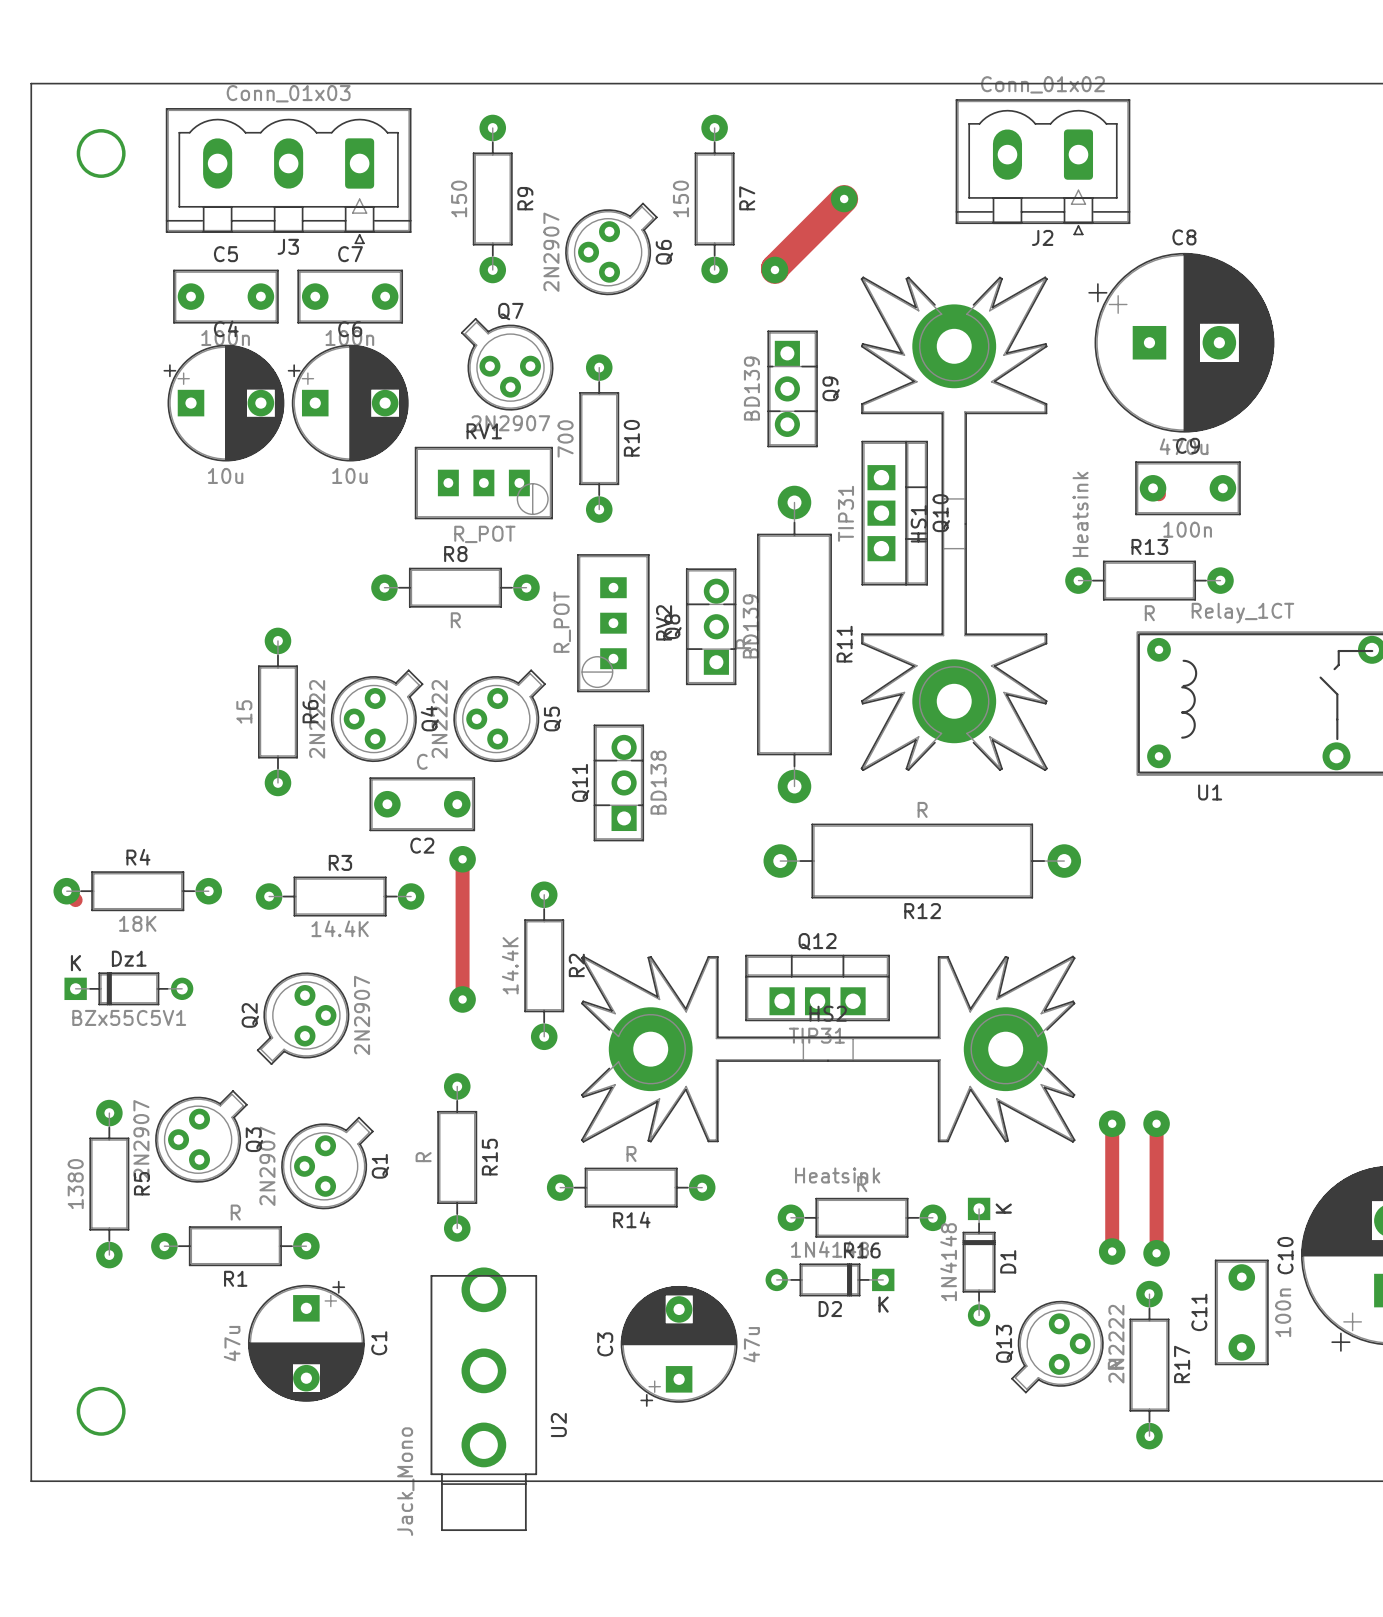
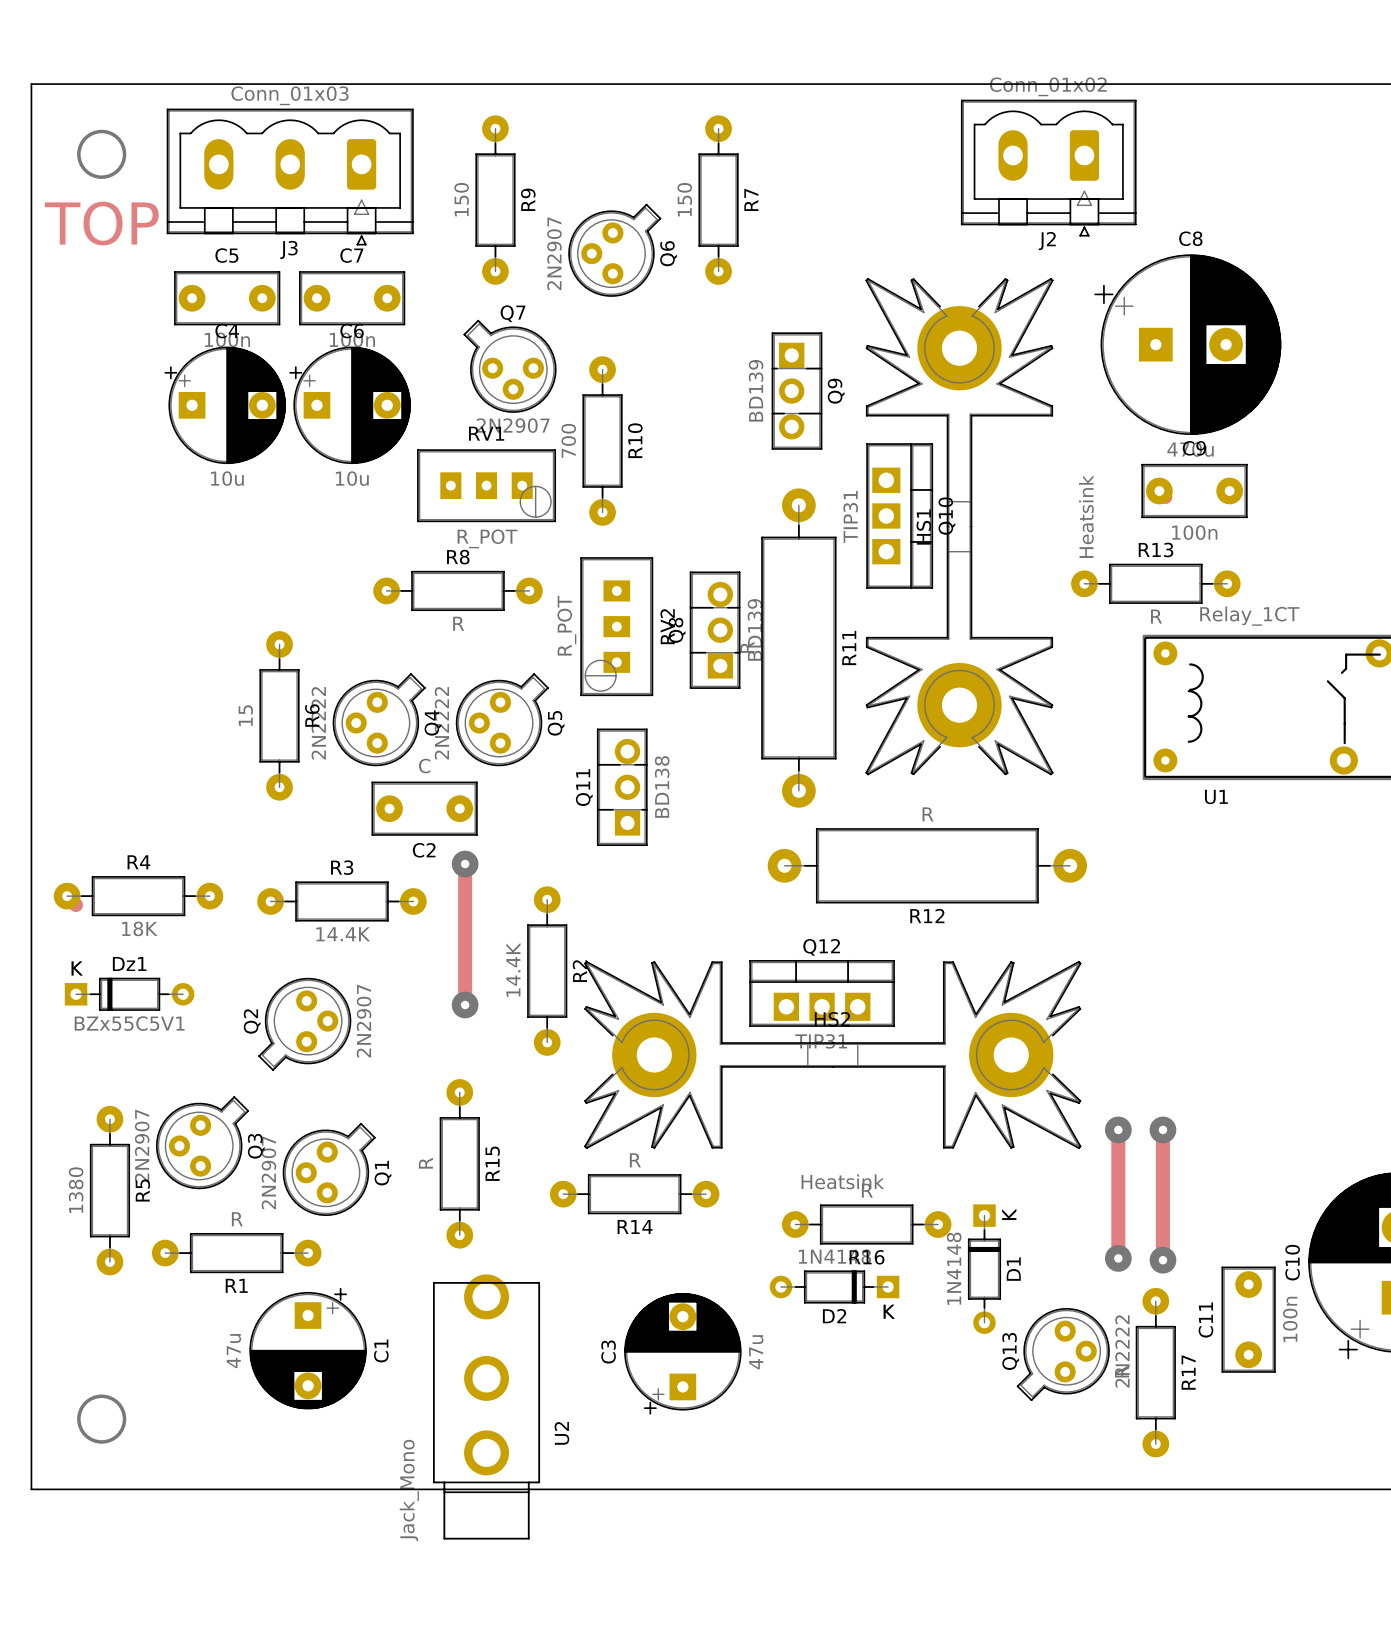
track: (844, 198) (774, 269) -> none
via: (844, 198) -> none
text: none -> TOP (101, 223)
via: (774, 269) -> none

